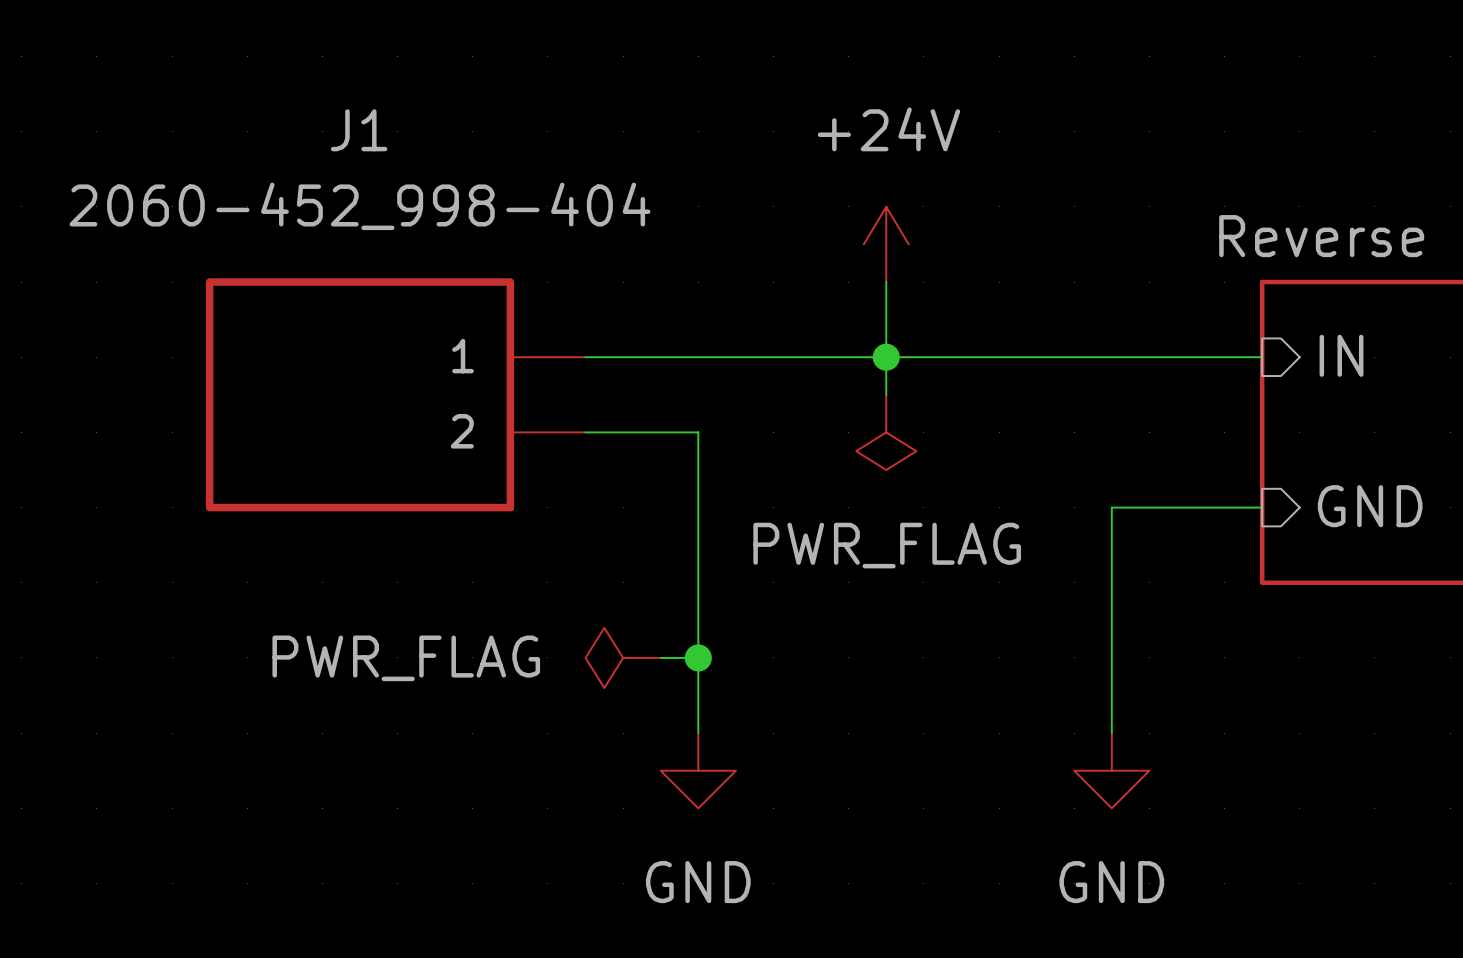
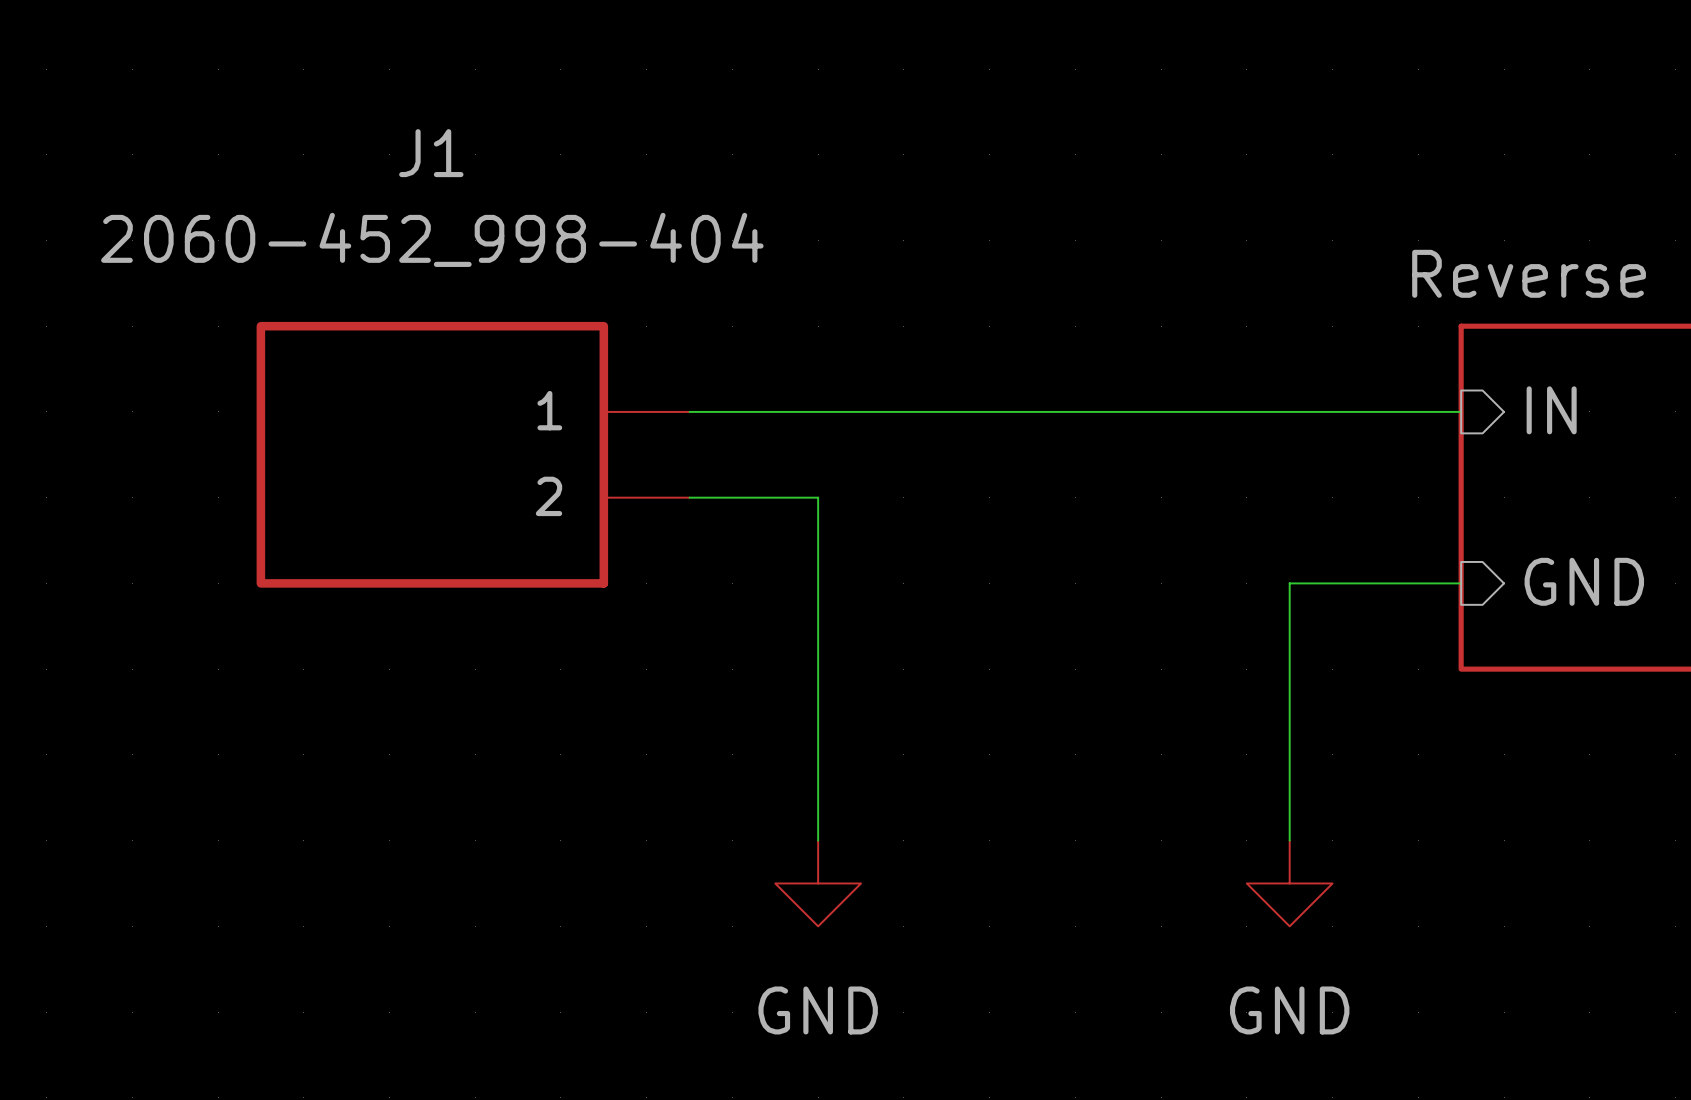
power symbol: +24V (886, 244) -> none
wire: (886, 282) (886, 394) -> none
junction: (886, 357) -> none
power symbol: PWR_FLAG (886, 432) -> none
power symbol: PWR_FLAG (623, 657) -> none
wire: (660, 657) (698, 657) -> none
junction: (698, 657) -> none

